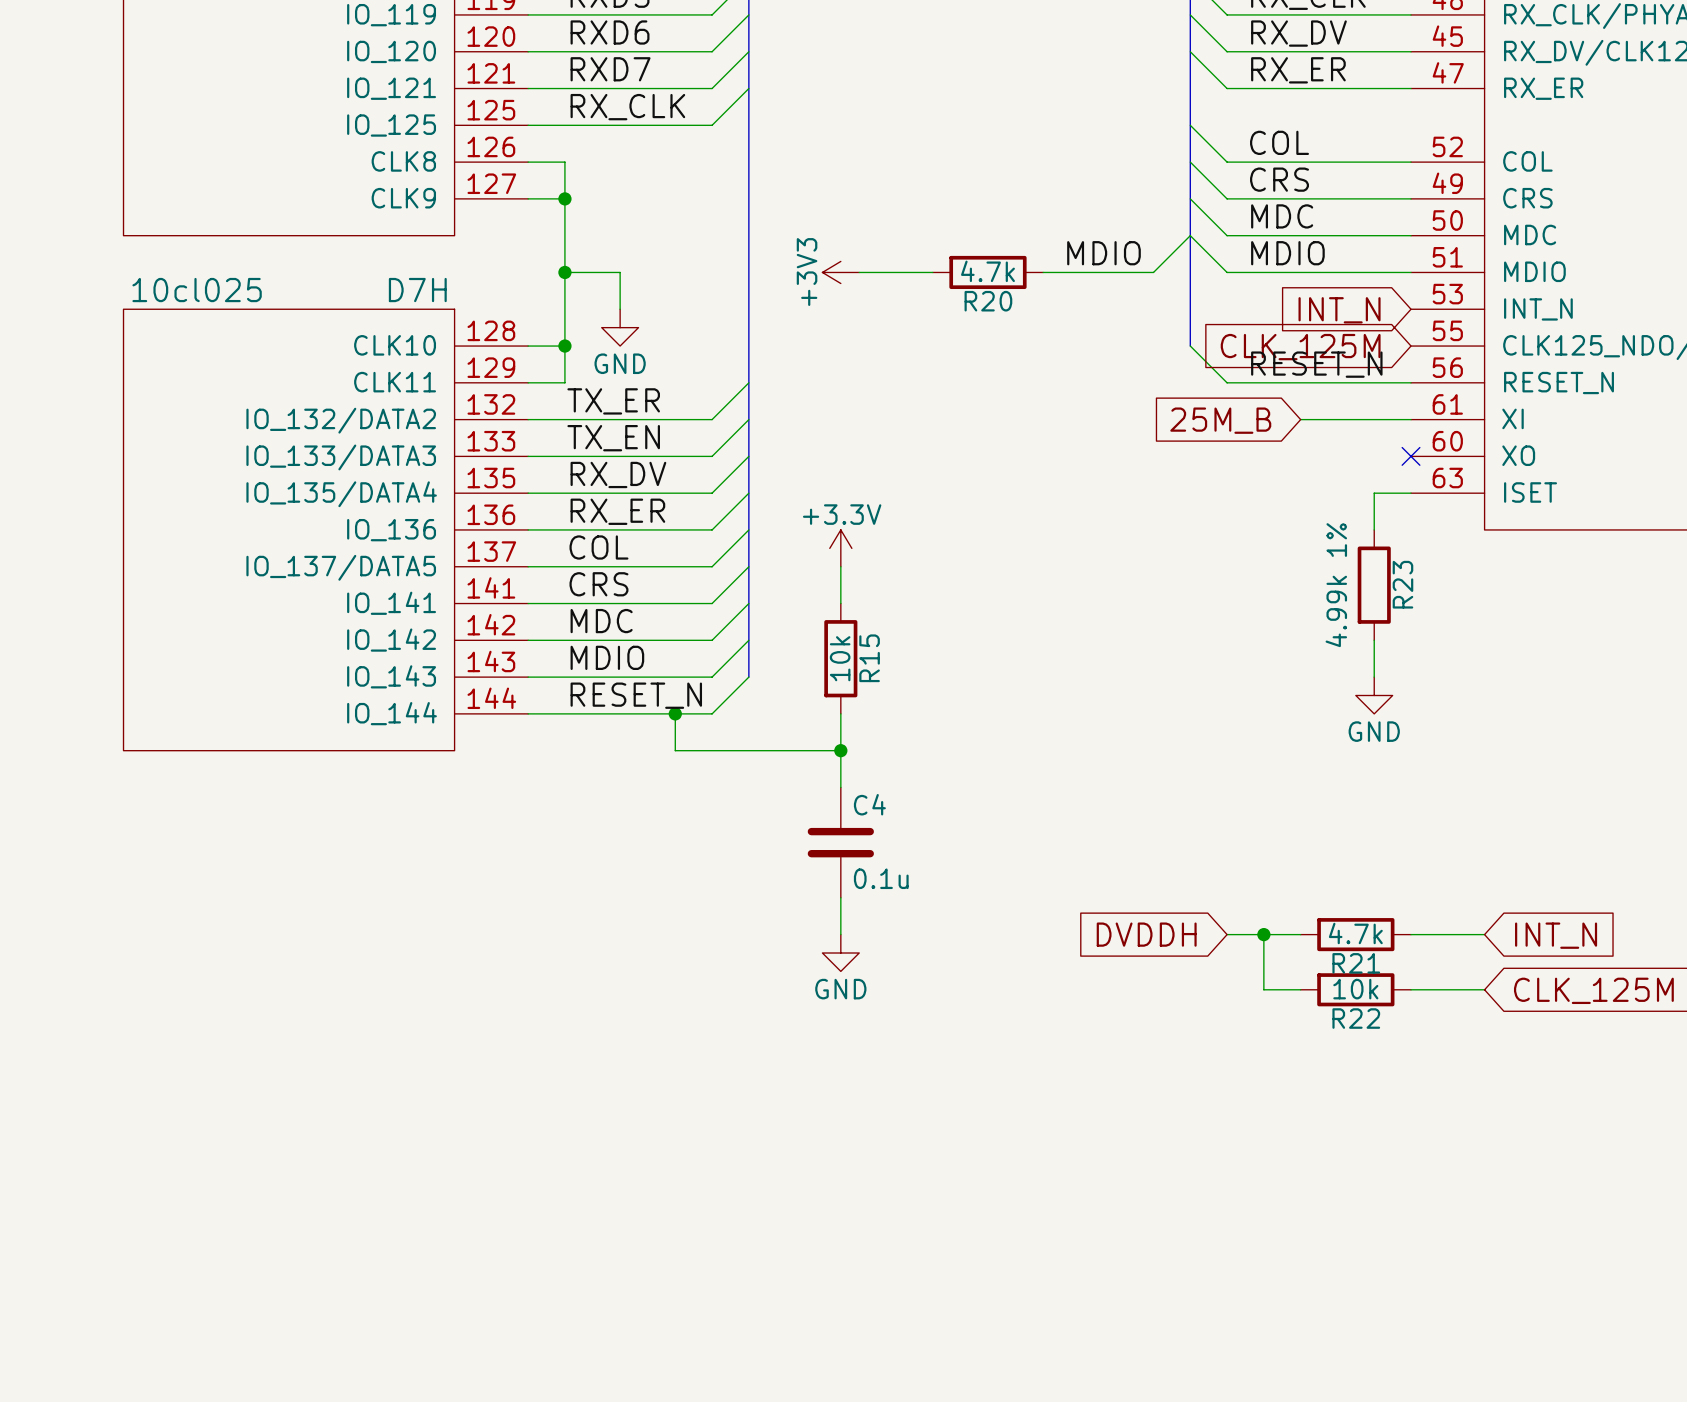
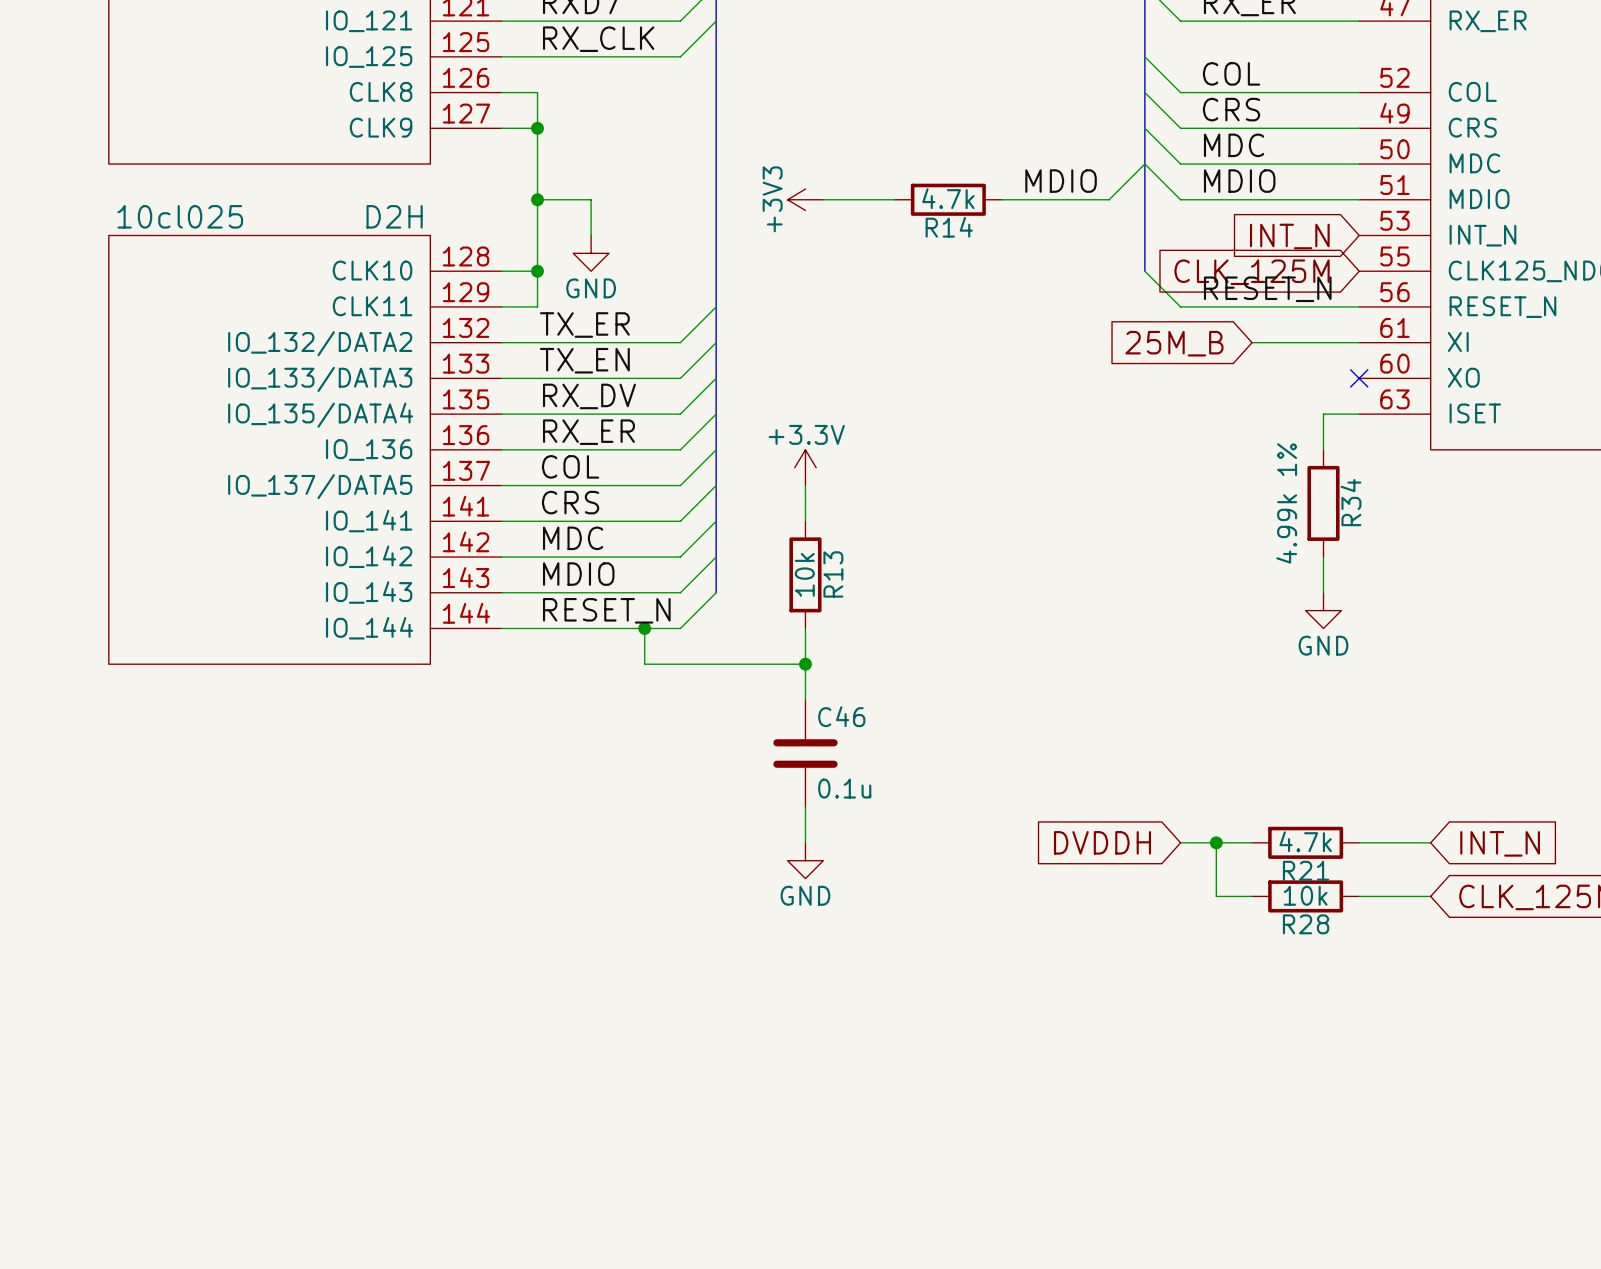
D7H name: D7H (417, 290) -> D2H (394, 216)
R20 name: R20 (988, 301) -> R14 (949, 227)
R23 name: R23 (1402, 584) -> R34 (1350, 502)
R15 name: R15 (869, 658) -> R13 (833, 574)
C4 name: C4 (869, 804) -> C46 (841, 716)
R22 name: R22 (1356, 1018) -> R28 (1306, 924)

